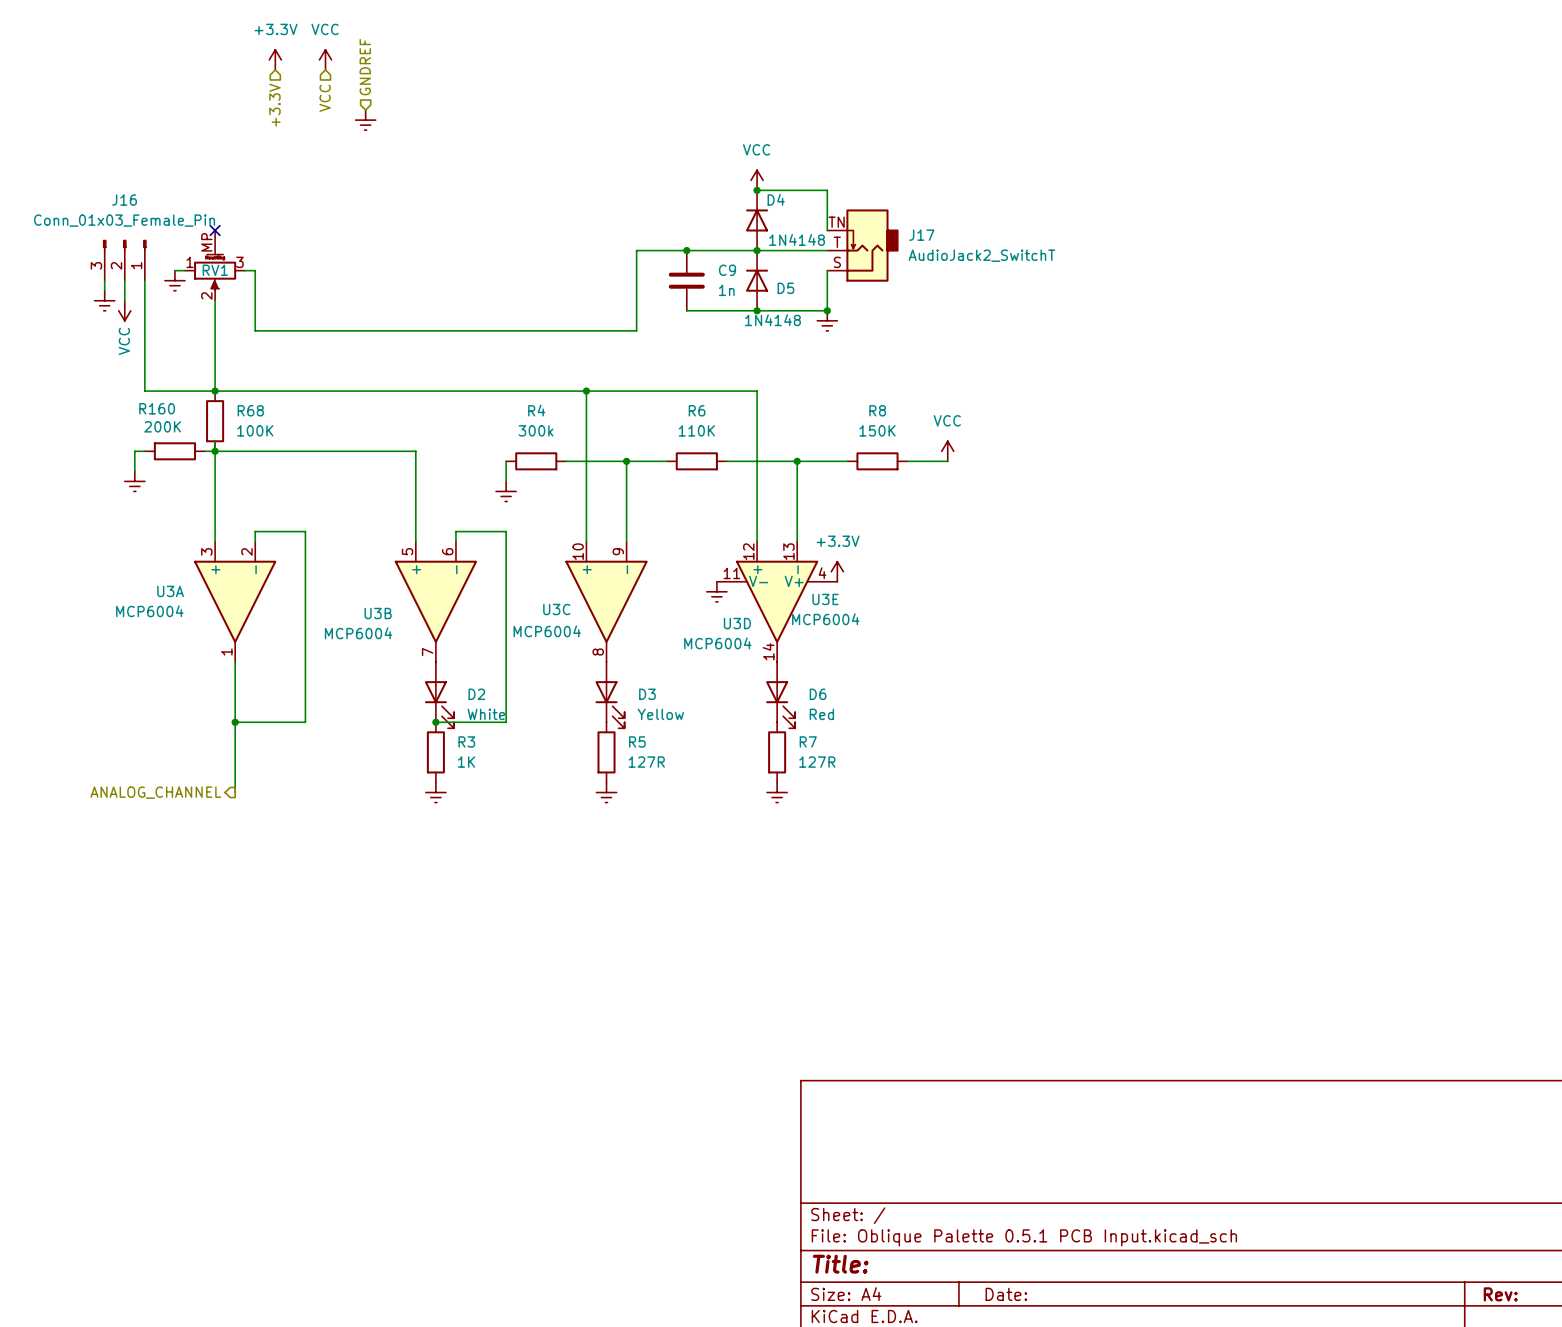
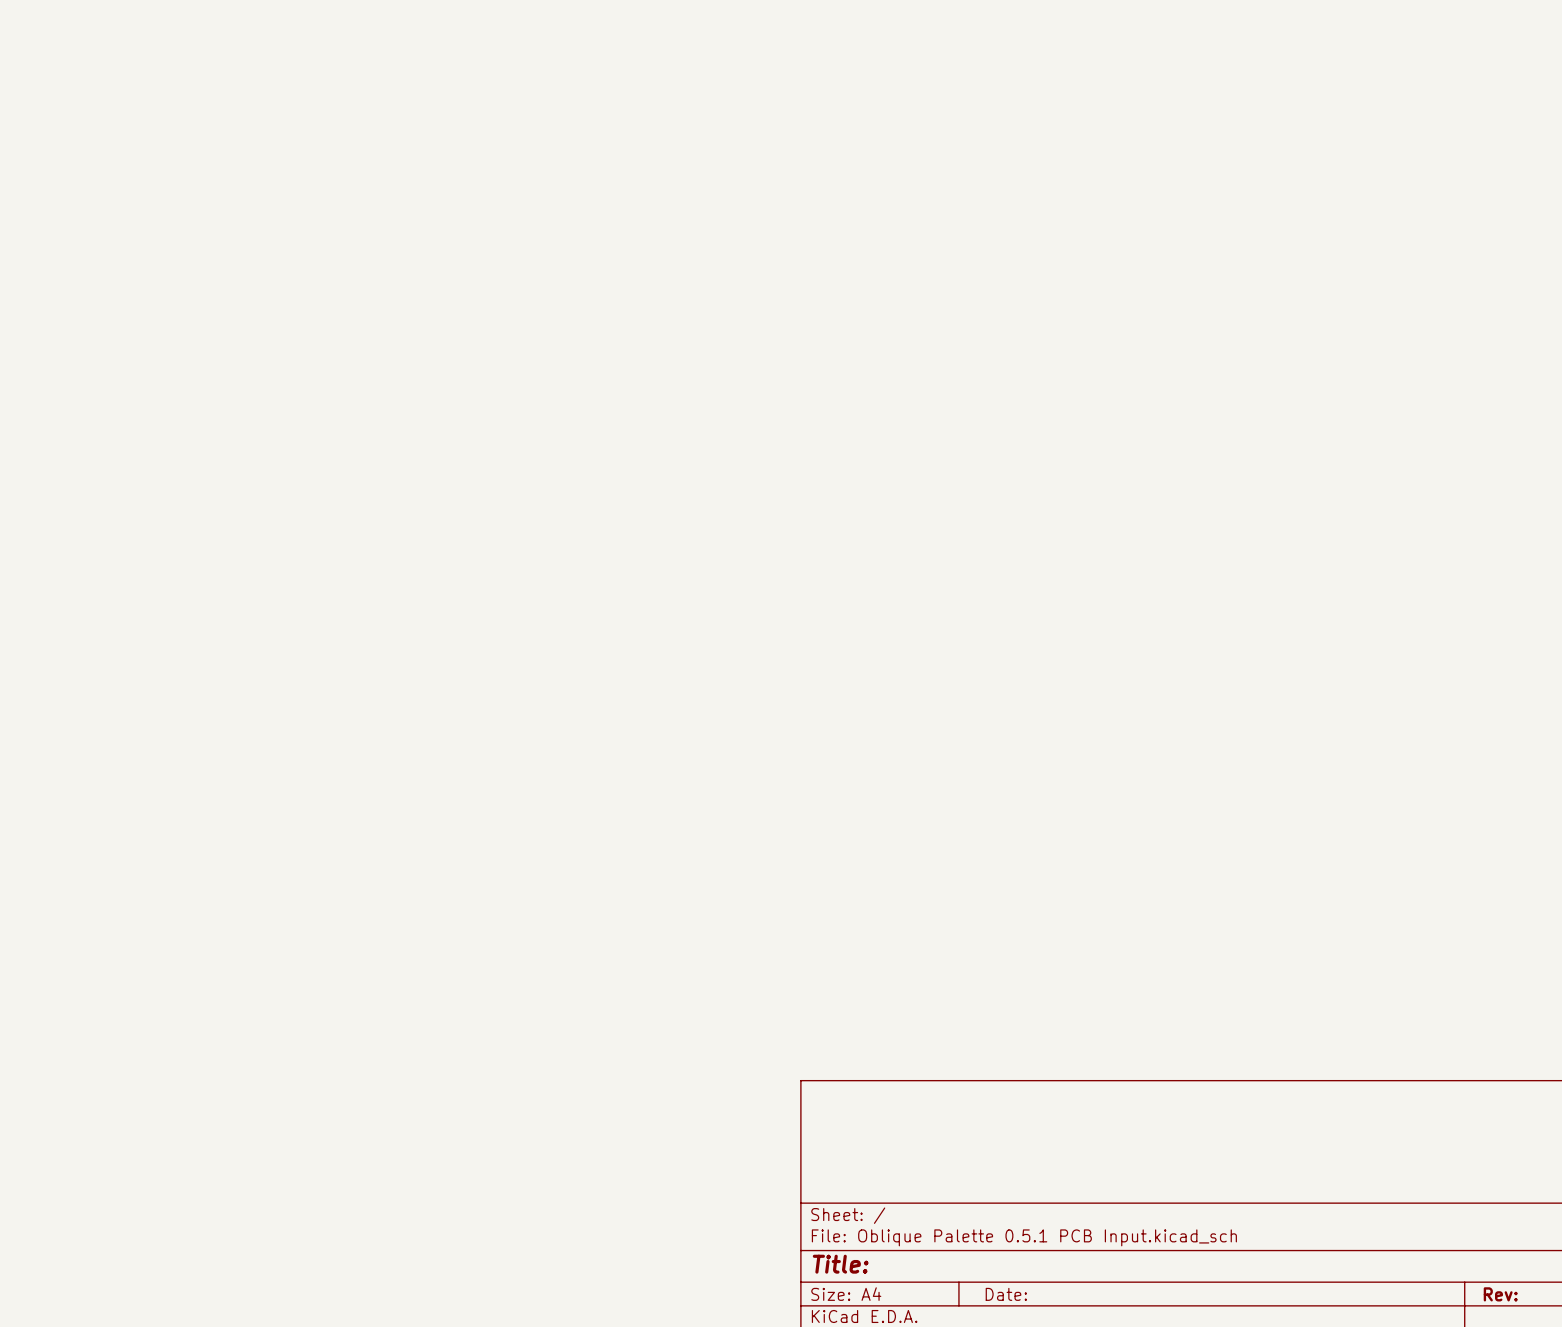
power symbol: +3.3V (275, 59) -> none
power symbol: VCC (325, 59) -> none
hierarchical label: GNDREF (365, 67) -> none
hierarchical label: VCC (325, 98) -> none
hierarchical label: +3.3V (274, 105) -> none
power symbol: (365, 120) -> none
power symbol: VCC (757, 180) -> none
wire: (757, 190) (827, 190) (827, 230) -> none
junction: (757, 190) -> none
D4: 1N4148 (757, 220) -> none
no-connect mark: (215, 230) -> none
J17: AudioJack2_SwitchT (862, 245) -> none
junction: (686, 250) -> none
junction: (757, 250) -> none
wire: (827, 250) (636, 250) (636, 330) (255, 330) (255, 270) (245, 270) -> none
J16: Conn_01x03_Female_Pin (124, 260) -> none
RV1: (215, 265) -> none
wire: (174, 270) (184, 270) -> none
wire: (827, 270) (827, 310) (686, 310) -> none
wire: (104, 280) (104, 290) -> none
wire: (124, 280) (124, 300) -> none
wire: (144, 280) (144, 391) (757, 391) (757, 541) -> none
power symbol: (174, 280) -> none
C9: 1n (686, 280) -> none
D5: 1N4148 (757, 280) -> none
power symbol: (104, 300) -> none
wire: (215, 300) (215, 391) -> none
power symbol: VCC (124, 310) -> none
junction: (757, 310) -> none
junction: (827, 310) -> none
power symbol: (827, 320) -> none
junction: (215, 391) -> none
wire: (586, 391) (586, 541) -> none
junction: (586, 391) -> none
R68: 100K (215, 421) -> none
wire: (215, 441) (215, 541) -> none
wire: (144, 451) (134, 451) (134, 471) -> none
R160: 200K (174, 451) -> none
wire: (205, 451) (415, 451) (415, 541) -> none
junction: (215, 451) -> none
power symbol: VCC (947, 451) -> none
wire: (506, 461) (506, 481) -> none
R4: 300k (536, 461) -> none
wire: (566, 461) (666, 461) -> none
wire: (626, 461) (626, 541) -> none
junction: (626, 461) -> none
R6: 110K (696, 461) -> none
wire: (726, 461) (847, 461) -> none
wire: (797, 461) (797, 541) -> none
junction: (797, 461) -> none
R8: 150K (877, 461) -> none
wire: (907, 461) (947, 461) -> none
power symbol: (134, 481) -> none
power symbol: (506, 491) -> none
wire: (255, 541) (255, 531) (305, 531) (305, 722) (235, 722) -> none
wire: (455, 541) (455, 531) (506, 531) (506, 722) (435, 722) -> none
power symbol: +3.3V (837, 571) -> none
U3E: MCP6004 (777, 581) -> none
power symbol: (716, 591) -> none
U3A: MCP6004 (235, 601) -> none
U3B: MCP6004 (435, 601) -> none
U3C: MCP6004 (606, 601) -> none
U3D: MCP6004 (777, 601) -> none
wire: (235, 662) (235, 792) -> none
D2: White (439, 695) -> none
D3: Yellow (610, 695) -> none
D6: Red (780, 695) -> none
junction: (235, 722) -> none
junction: (435, 722) -> none
R3: 1K (435, 752) -> none
R5: 127R (606, 752) -> none
R7: 127R (777, 752) -> none
hierarchical label: ANALOG_CHANNEL (155, 792) -> none
power symbol: (435, 792) -> none
power symbol: (606, 792) -> none
power symbol: (777, 792) -> none

